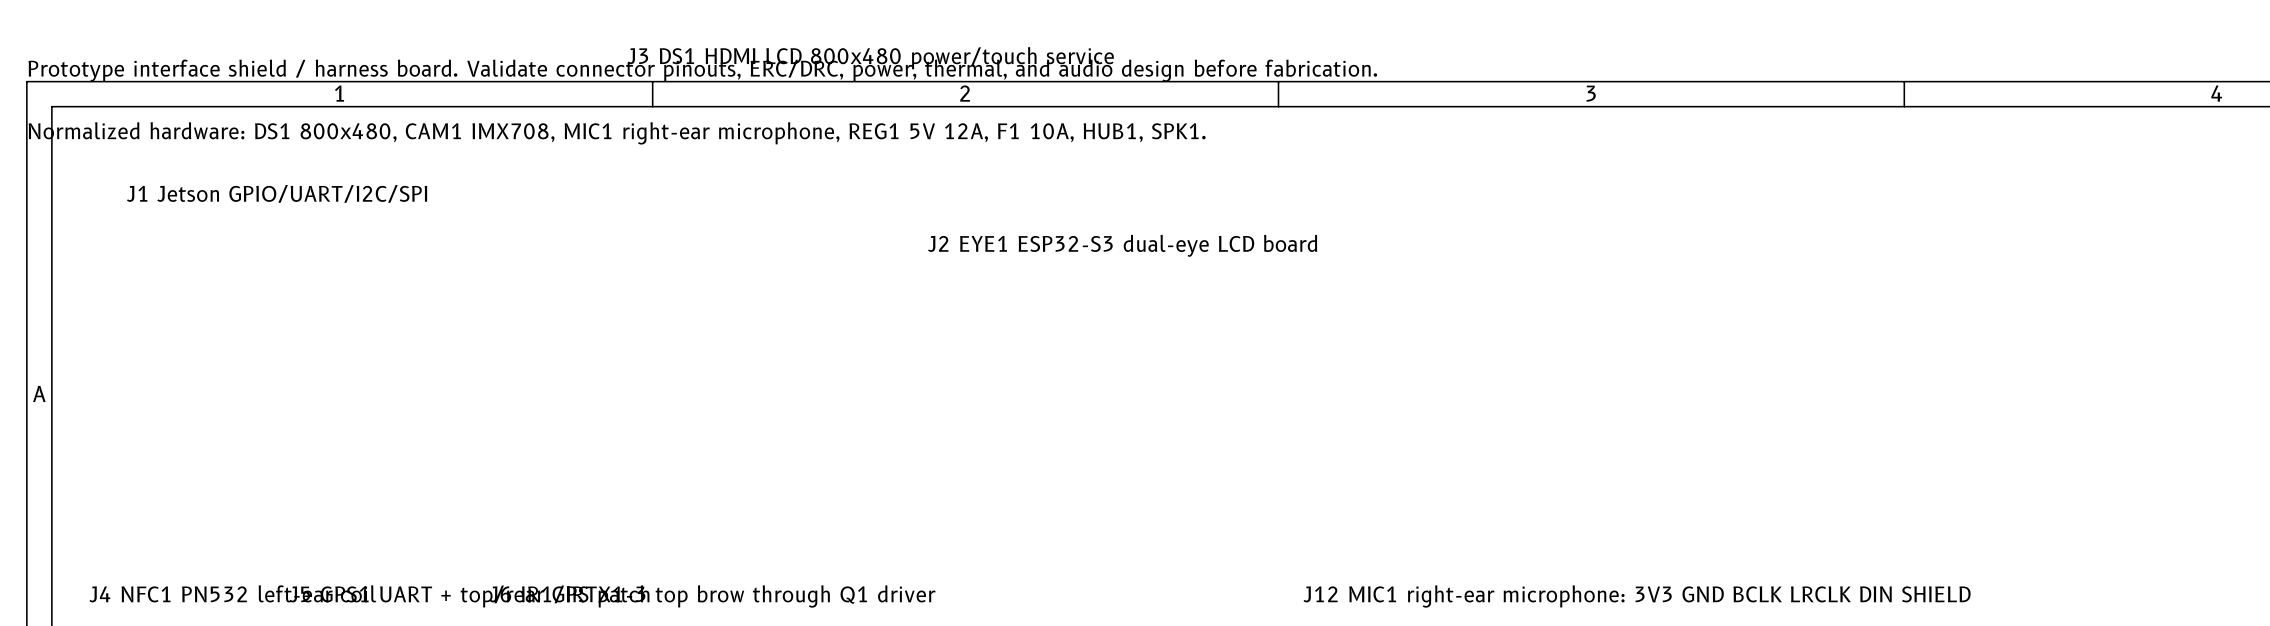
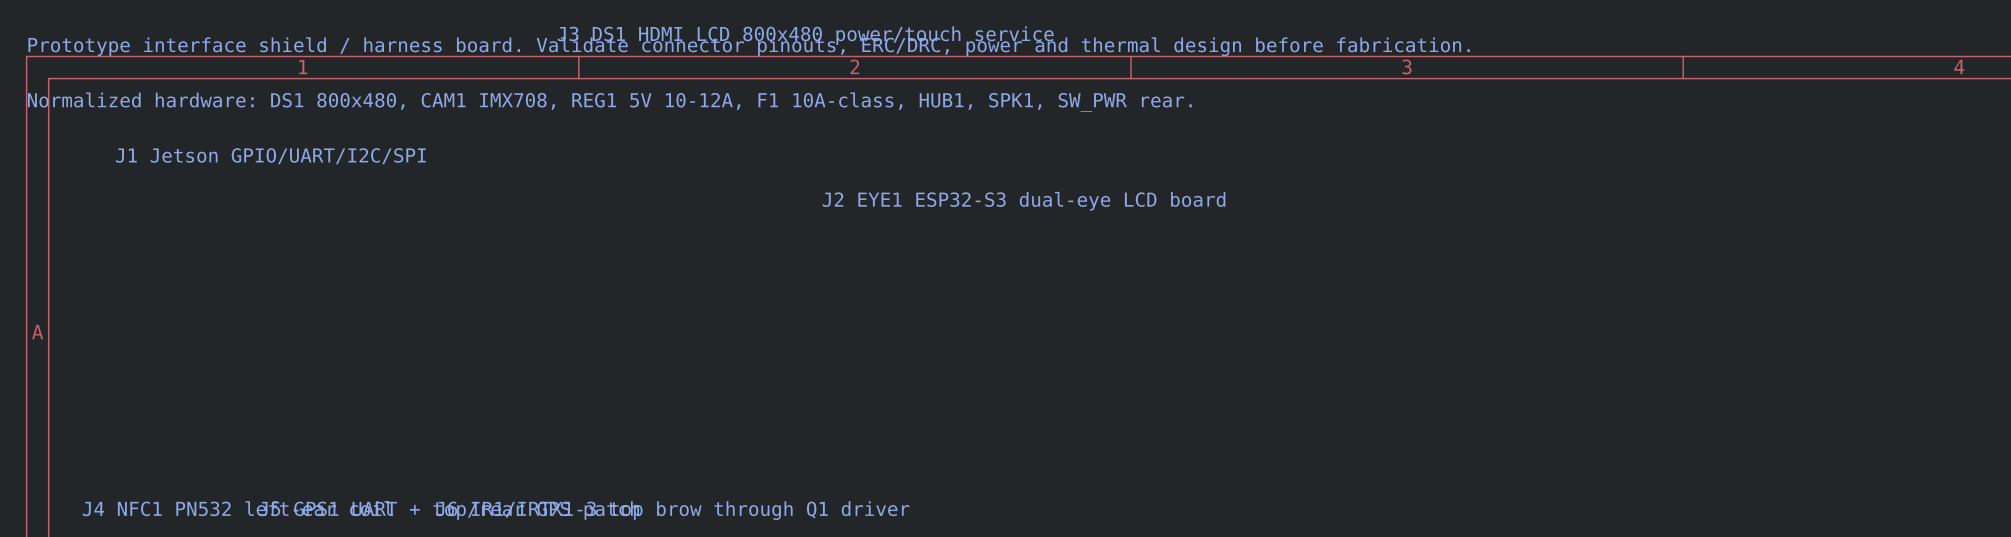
text: Prototype interface shield / harness board. Validate connector pinouts, ERC/DRC, power, thermal, and audio design before fabrication. (702, 70) -> Prototype interface shield / harness board. Validate connector pinouts, ERC/DRC, power and thermal design before fabrication. (749, 46)
text: Normalized hardware: DS1 800x480, CAM1 IMX708, MIC1 right-ear microphone, REG1 5V 12A, F1 10A, HUB1, SPK1. (617, 133) -> Normalized hardware: DS1 800x480, CAM1 IMX708, REG1 5V 10-12A, F1 10A-class, HUB1, SPK1, SW_PWR rear. (609, 102)
text: J12 MIC1 right-ear microphone: 3V3 GND BCLK LRCLK DIN SHIELD (1637, 596) -> none

